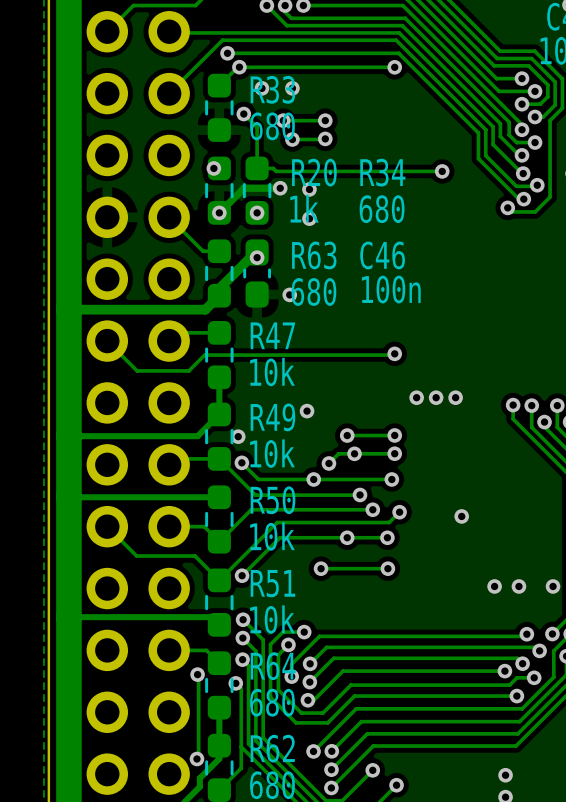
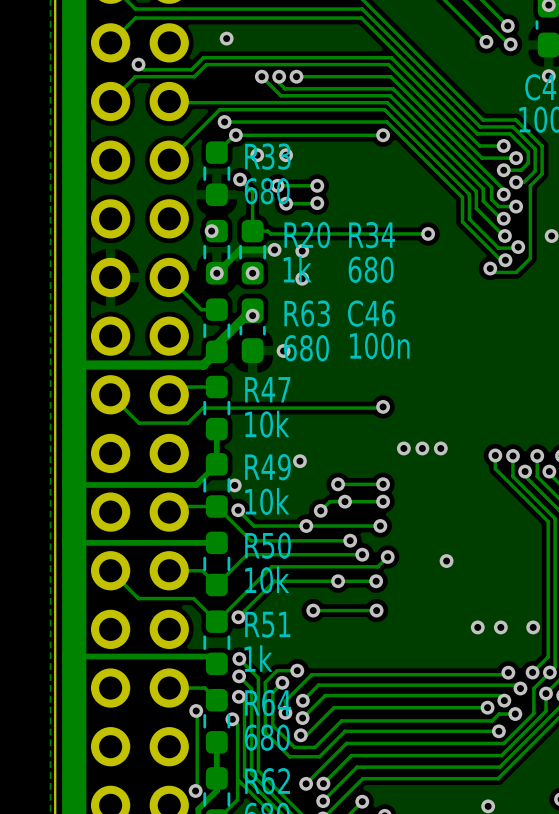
R51 text: 10k (272, 619) -> 1k (258, 658)

